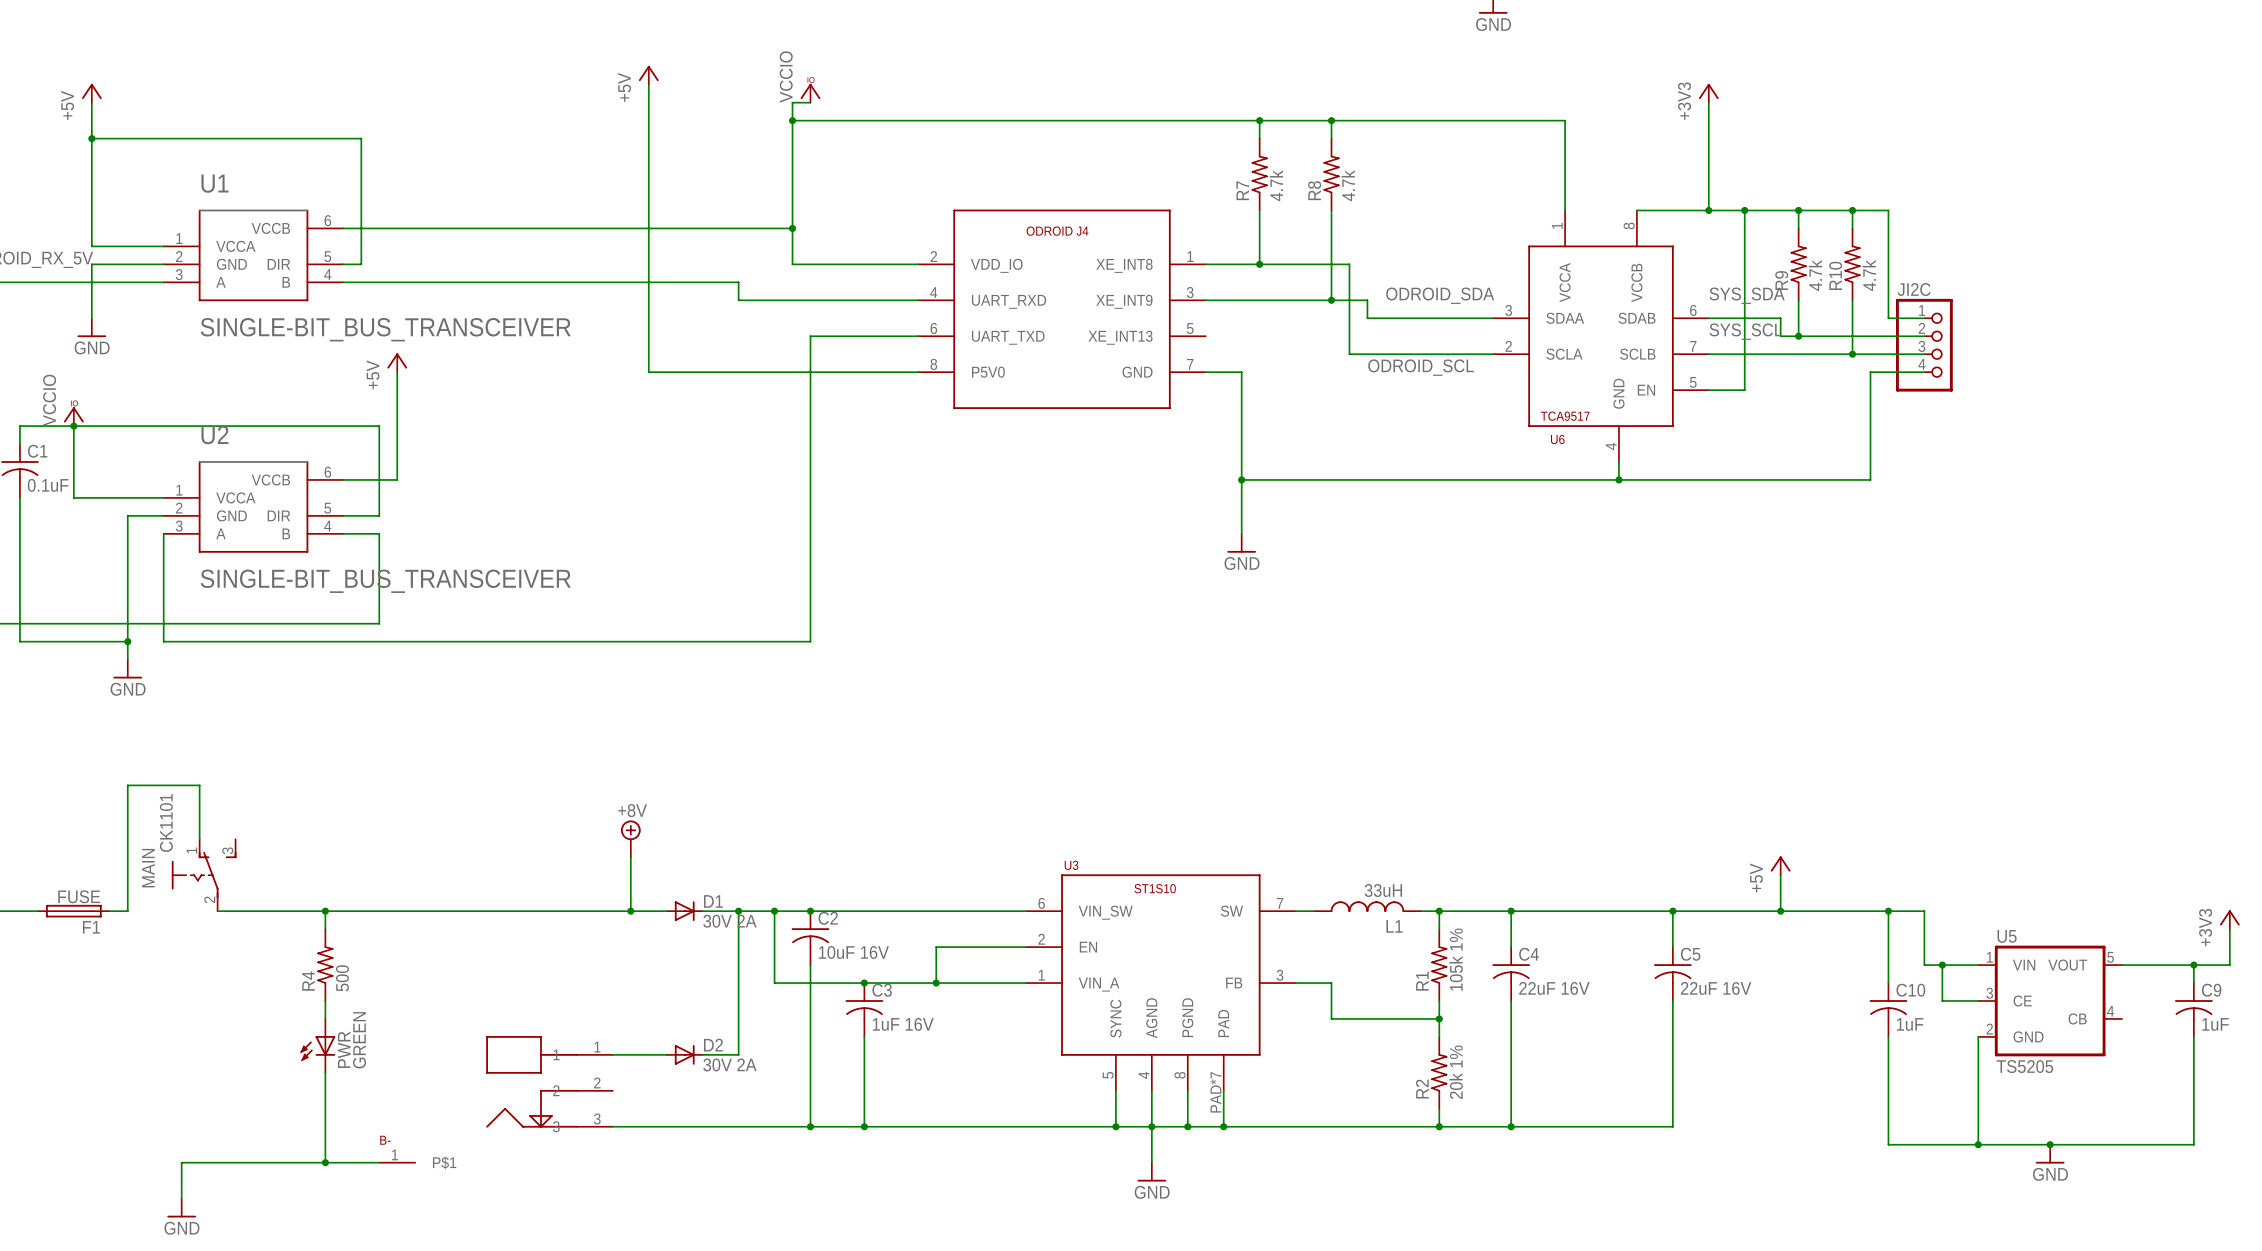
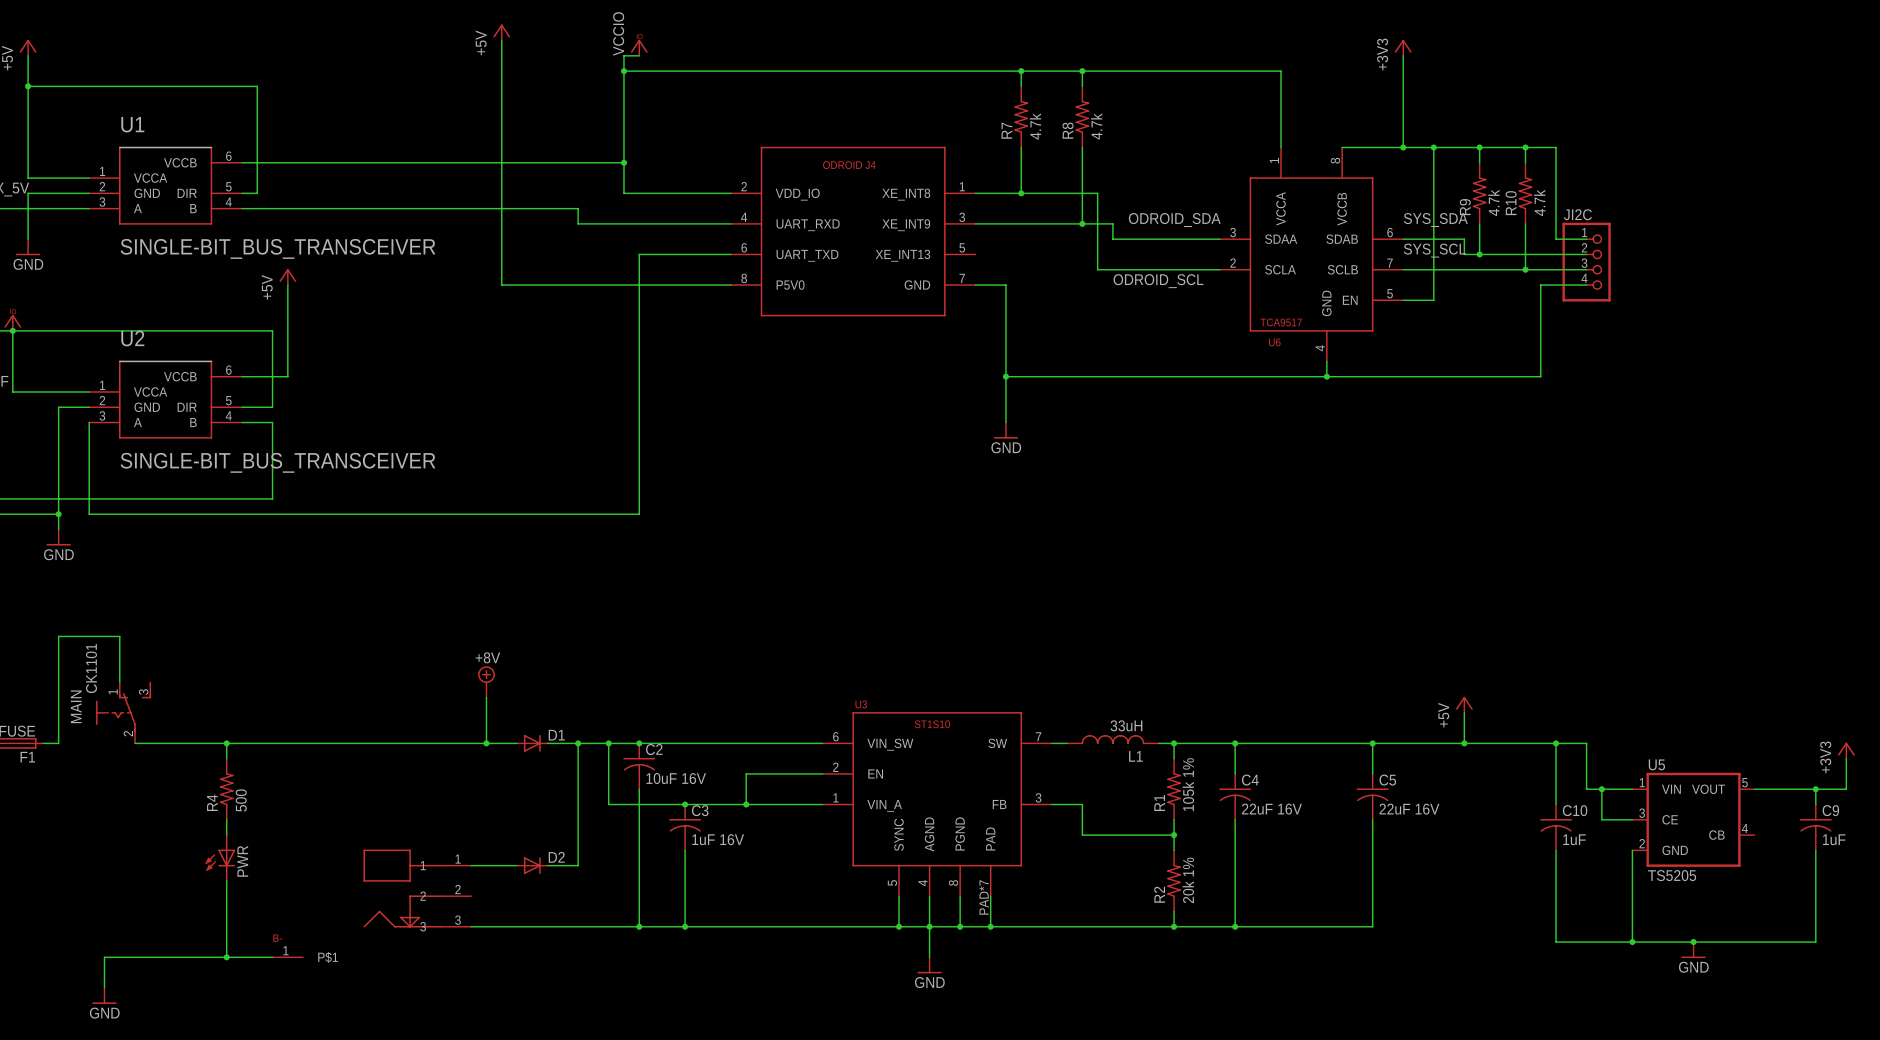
D1 value: 30V 2A (729, 921) -> none
PWR value: GREEN (359, 1040) -> none
D2 value: 30V 2A (729, 1064) -> none

